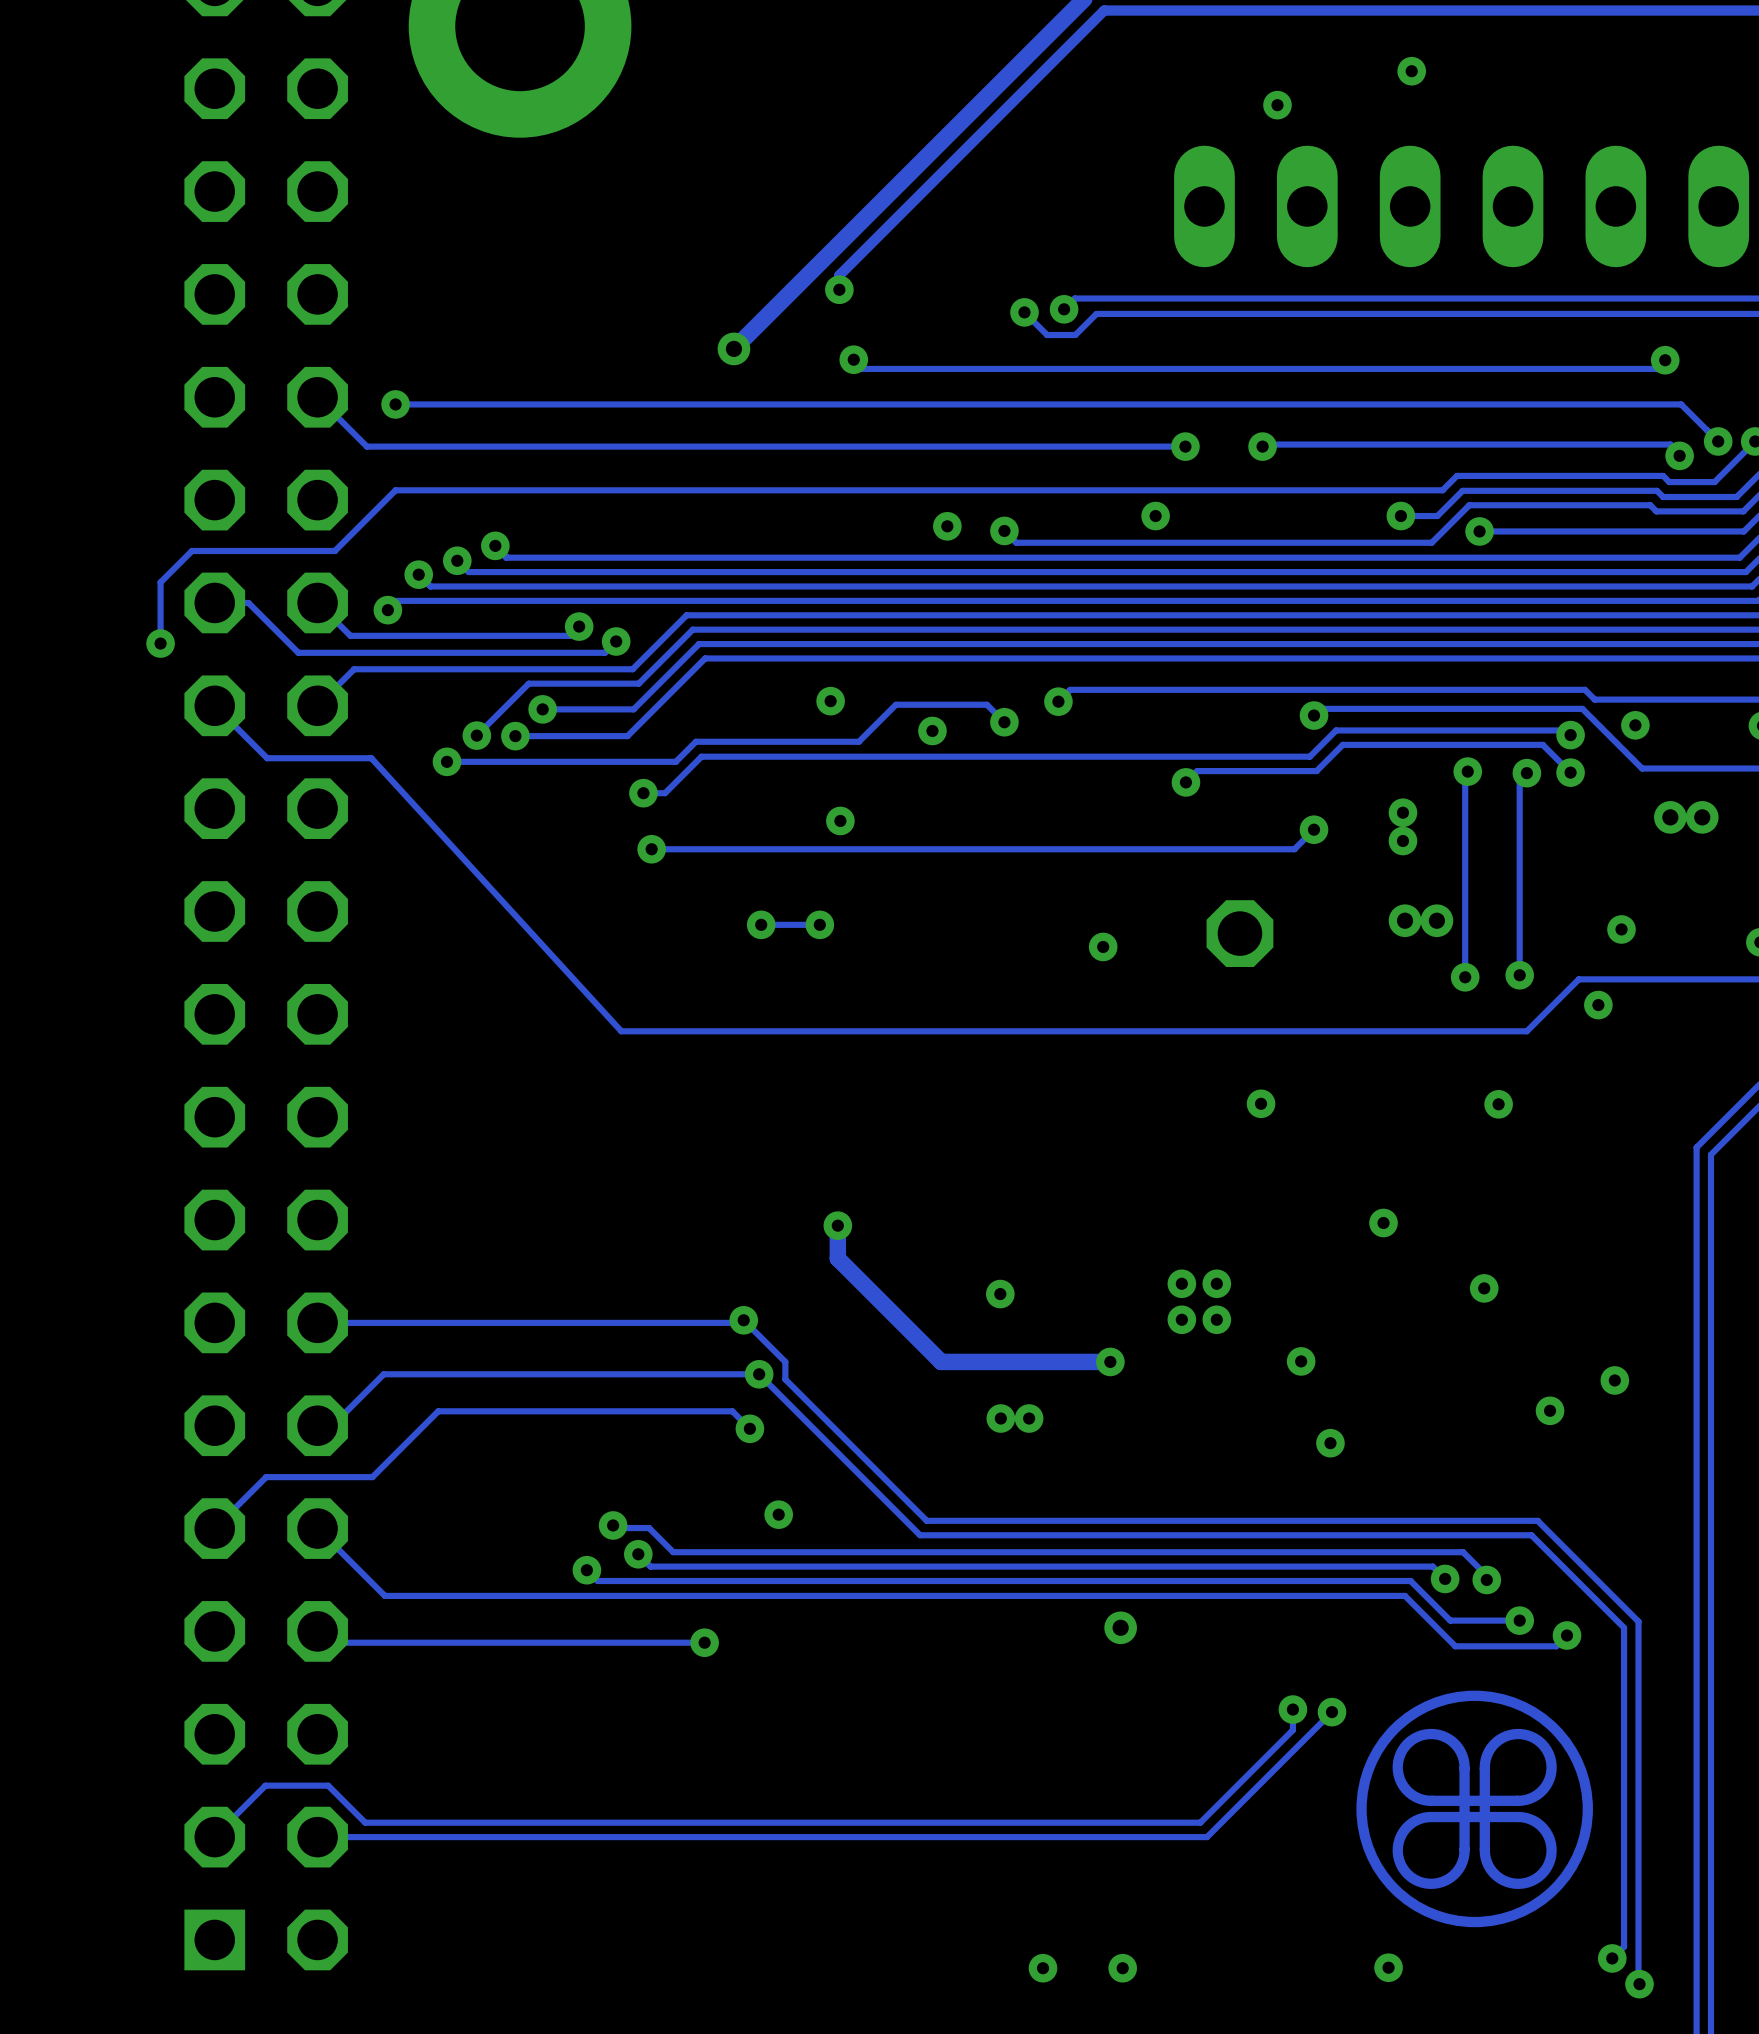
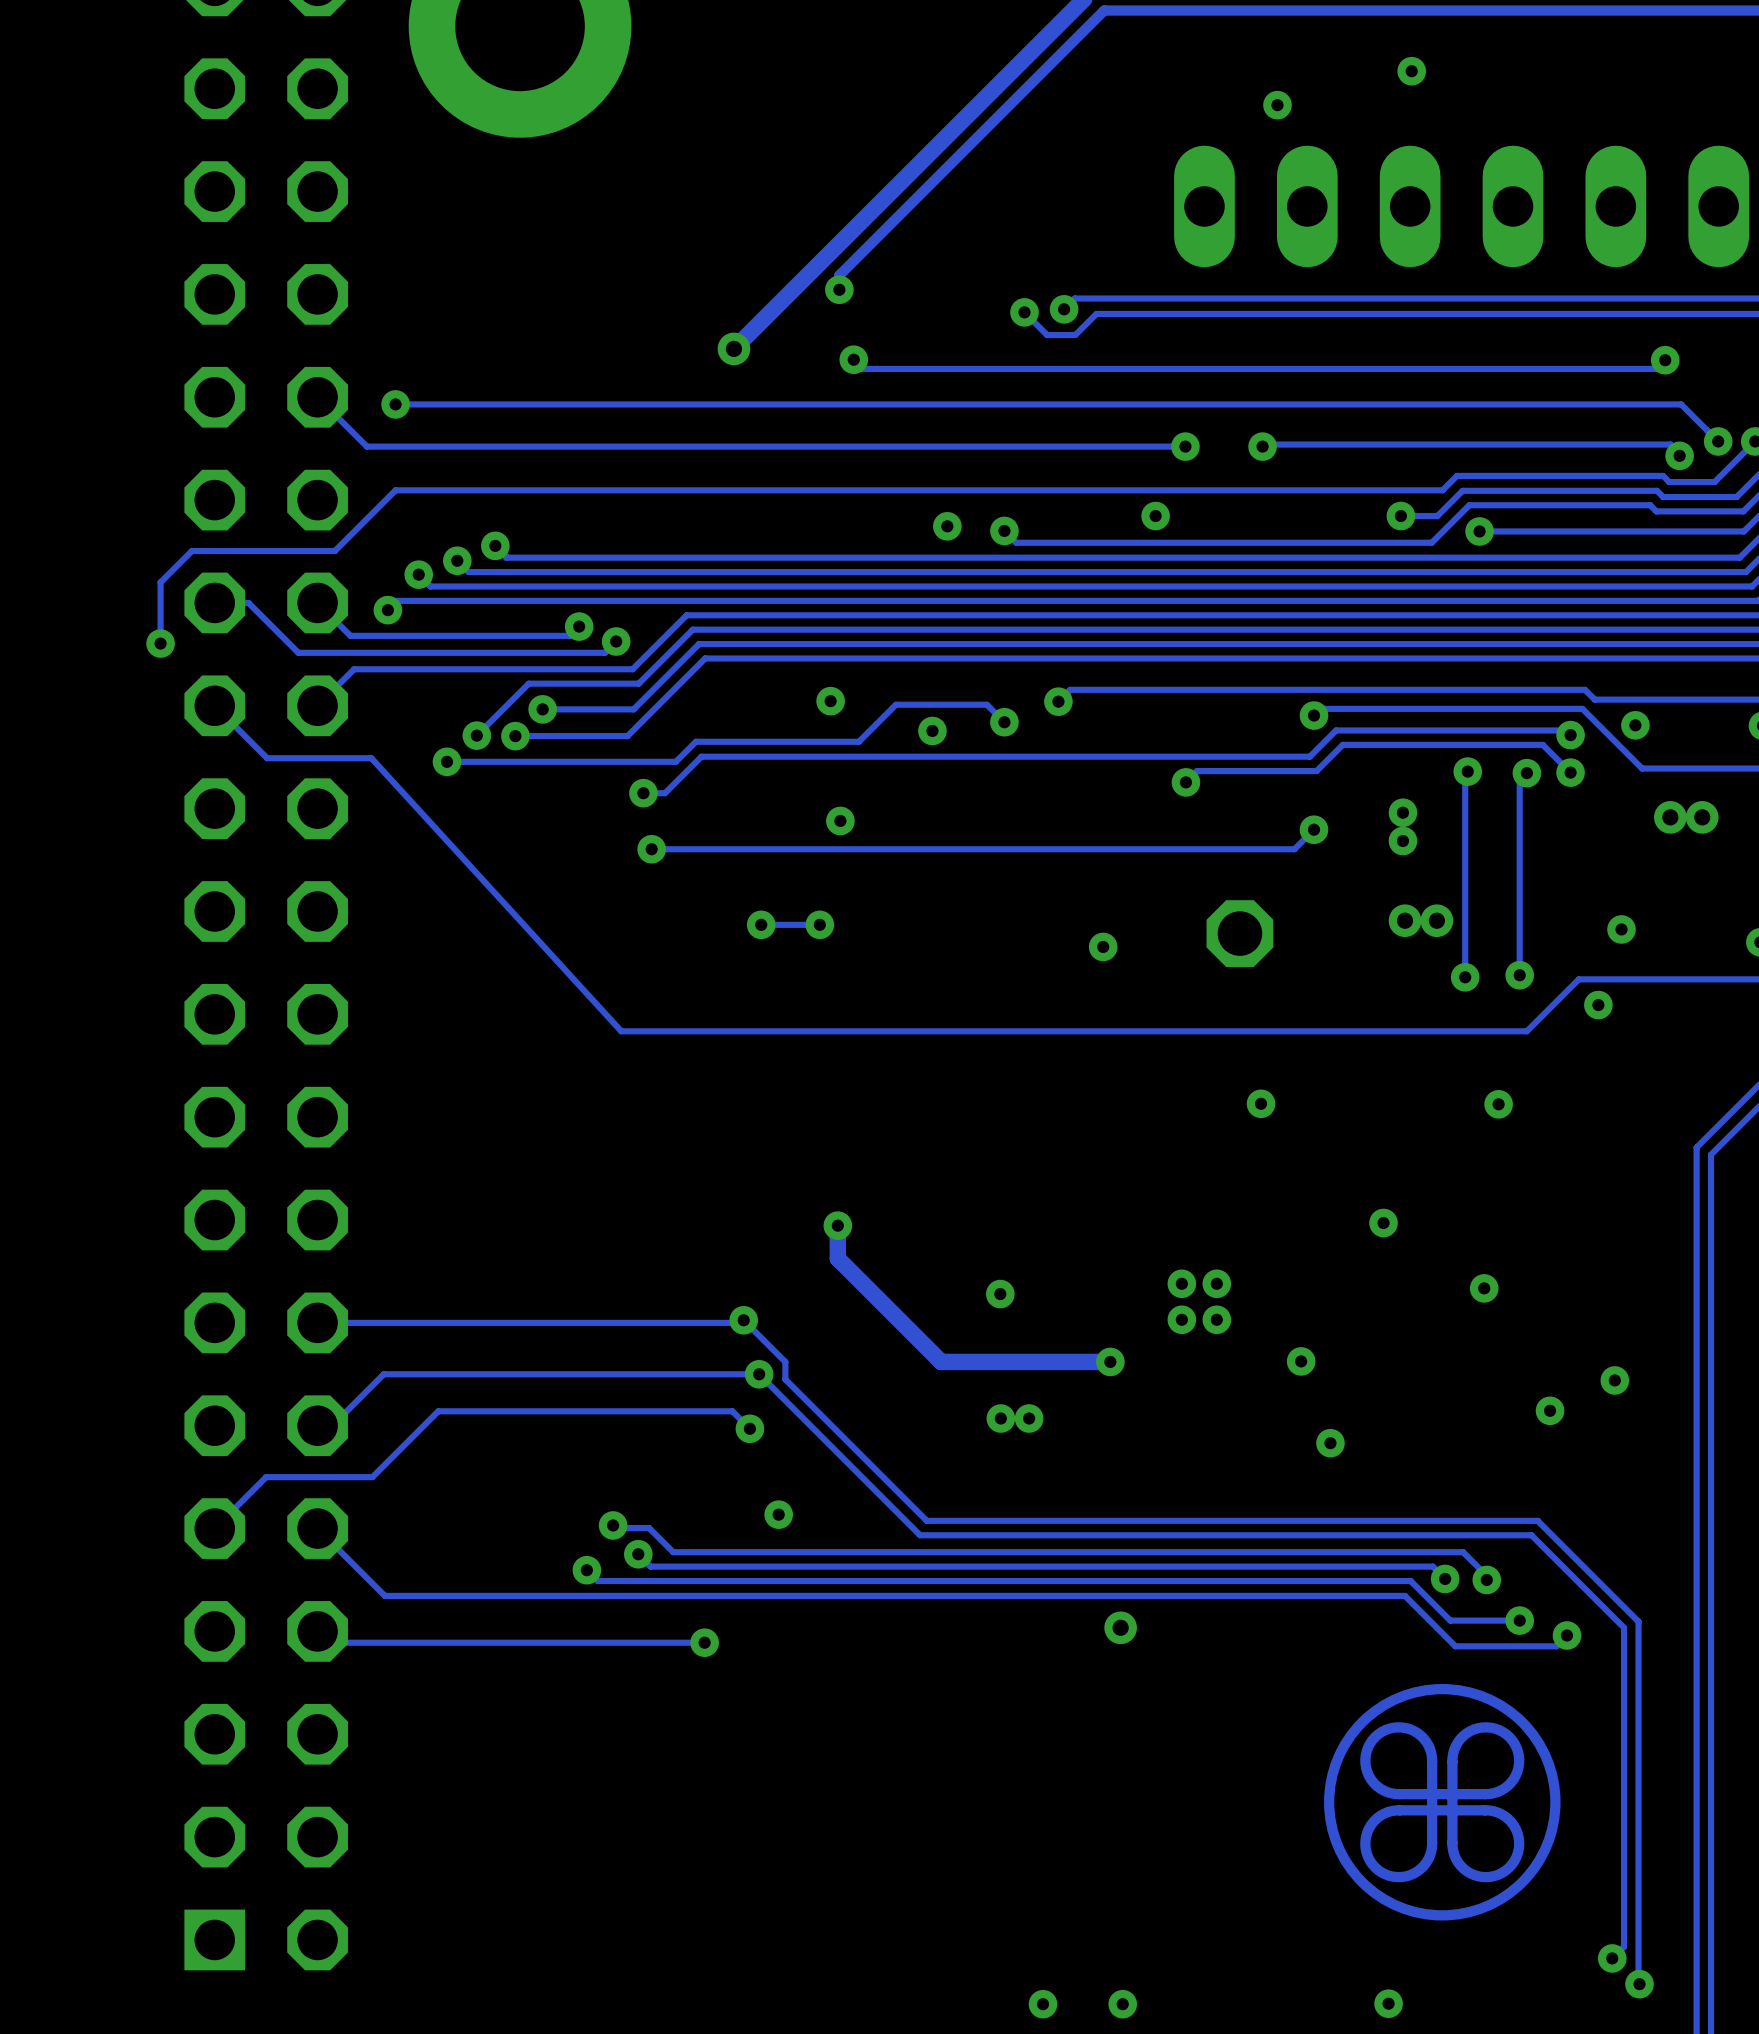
track: (1292, 1709) (1292, 1730) (1200, 1822) (365, 1822) (328, 1785) (265, 1785) (214, 1836) -> none
via: (1292, 1709) -> none
track: (1332, 1712) (1207, 1837) (317, 1837) -> none
via: (1332, 1712) -> none
drawing position: (1474, 1808) -> (1442, 1802)
via position: (1388, 1967) -> (1388, 2003)
via position: (1043, 1968) -> (1043, 2004)
via position: (1122, 1968) -> (1122, 2004)

